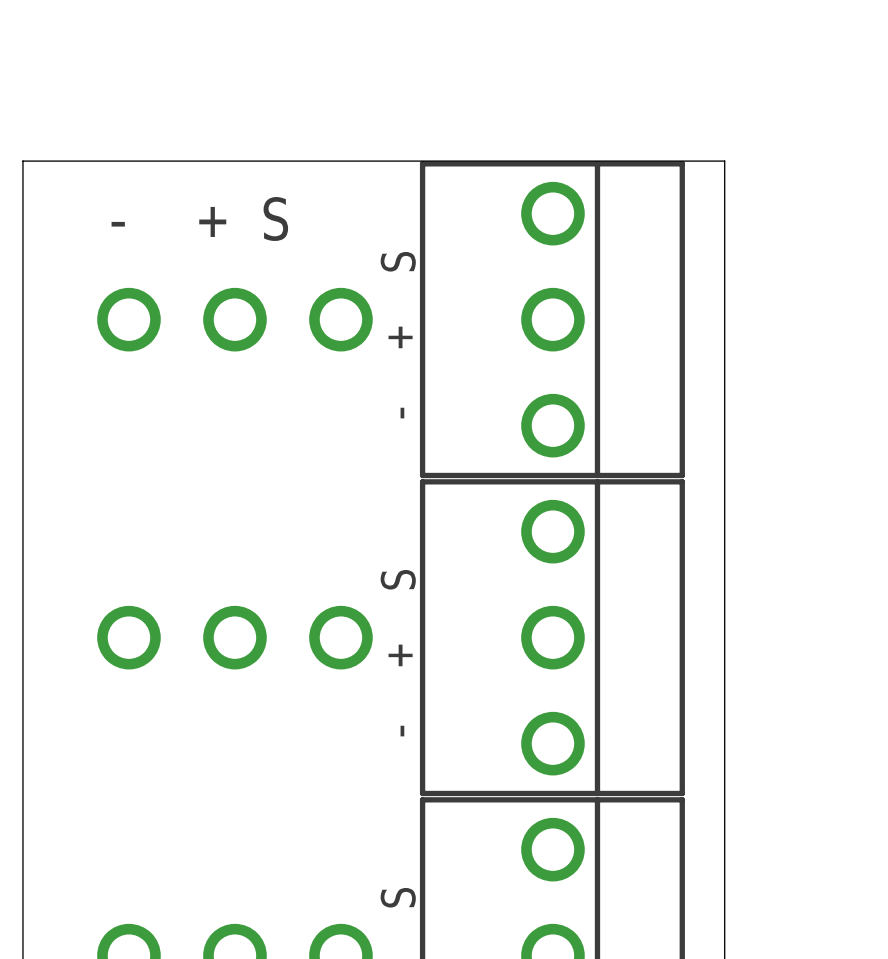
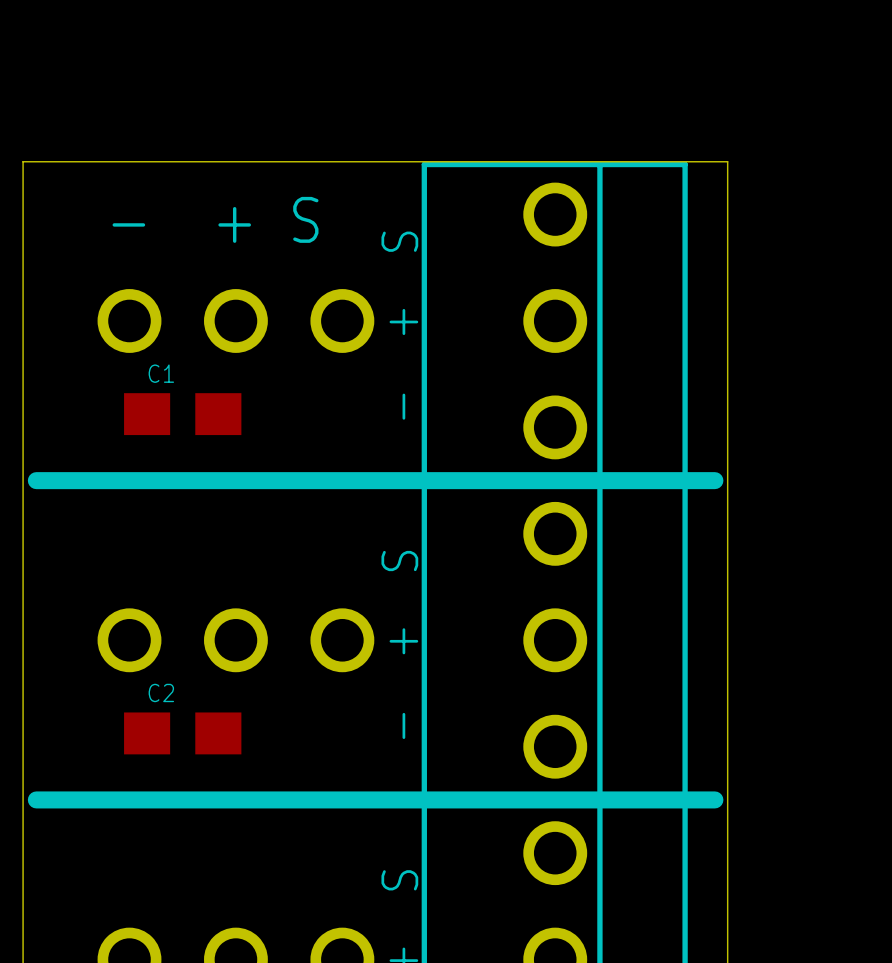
C1: none -> (182, 414)
line: none -> (36, 480) (714, 480)
C2: none -> (182, 733)
line: none -> (36, 799) (714, 799)

